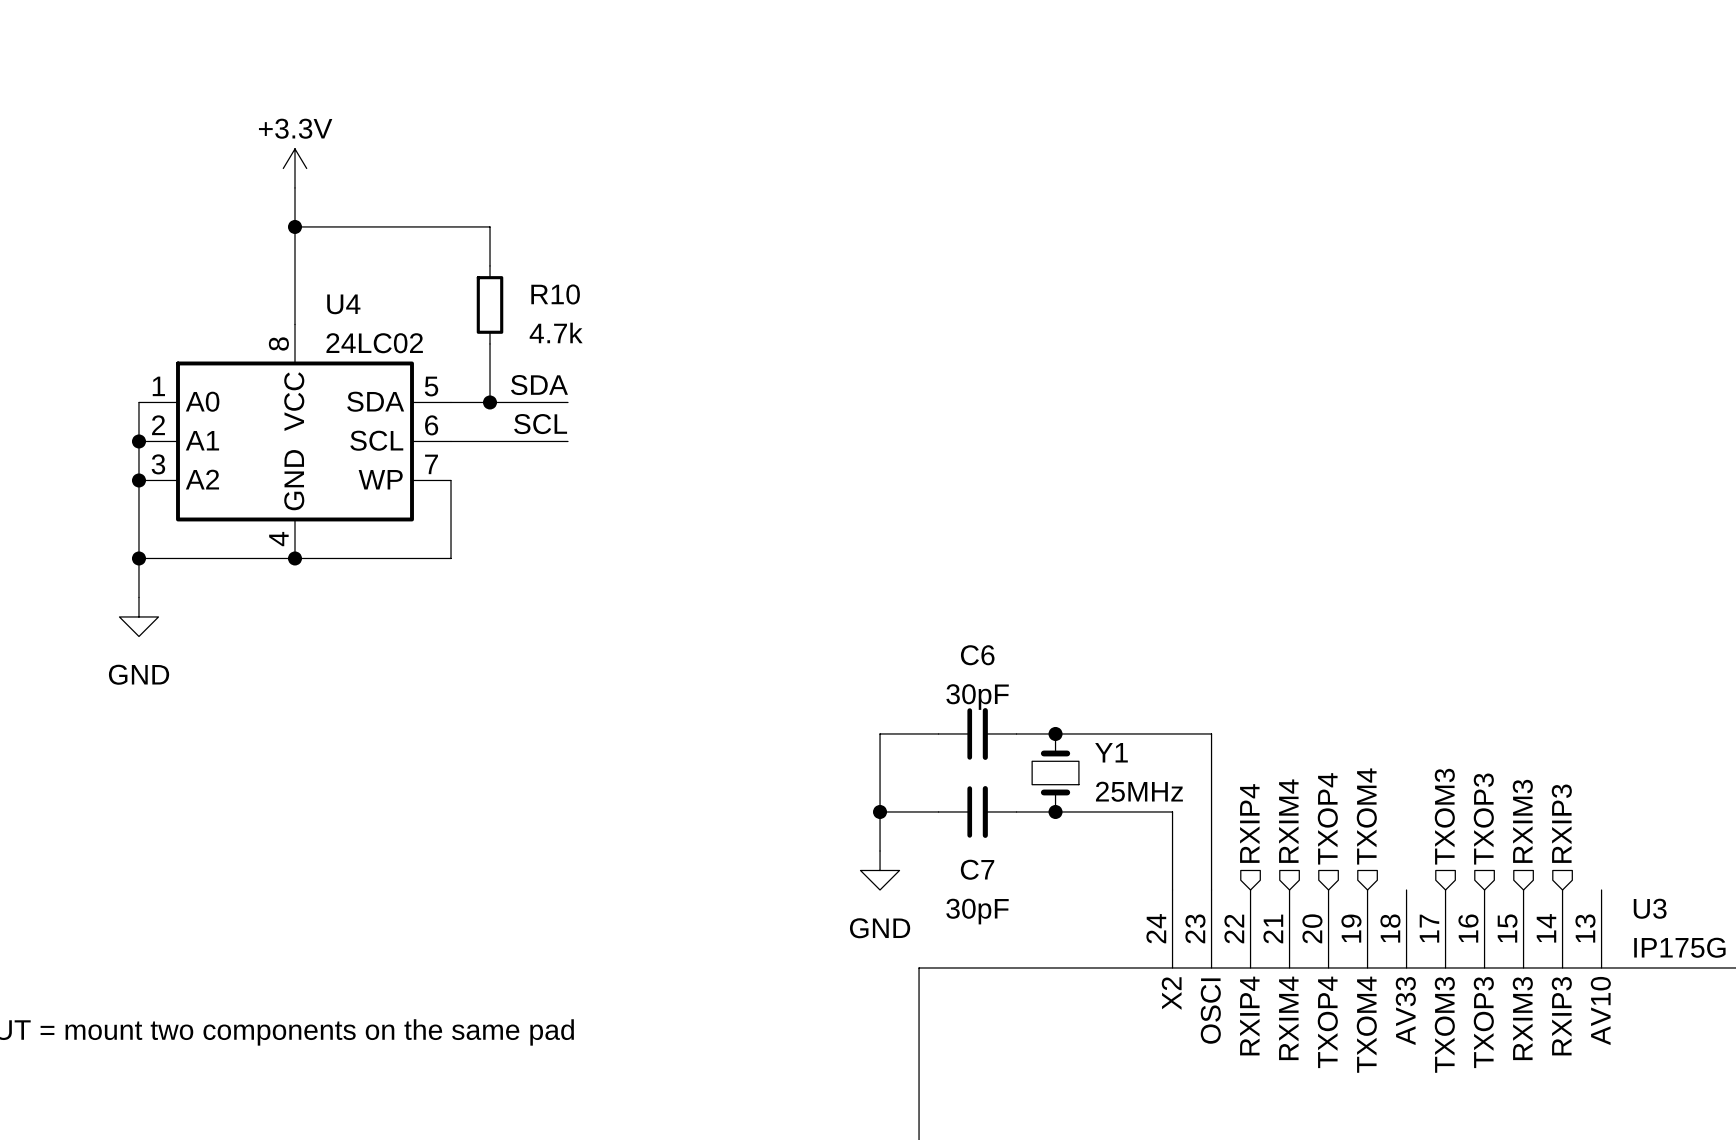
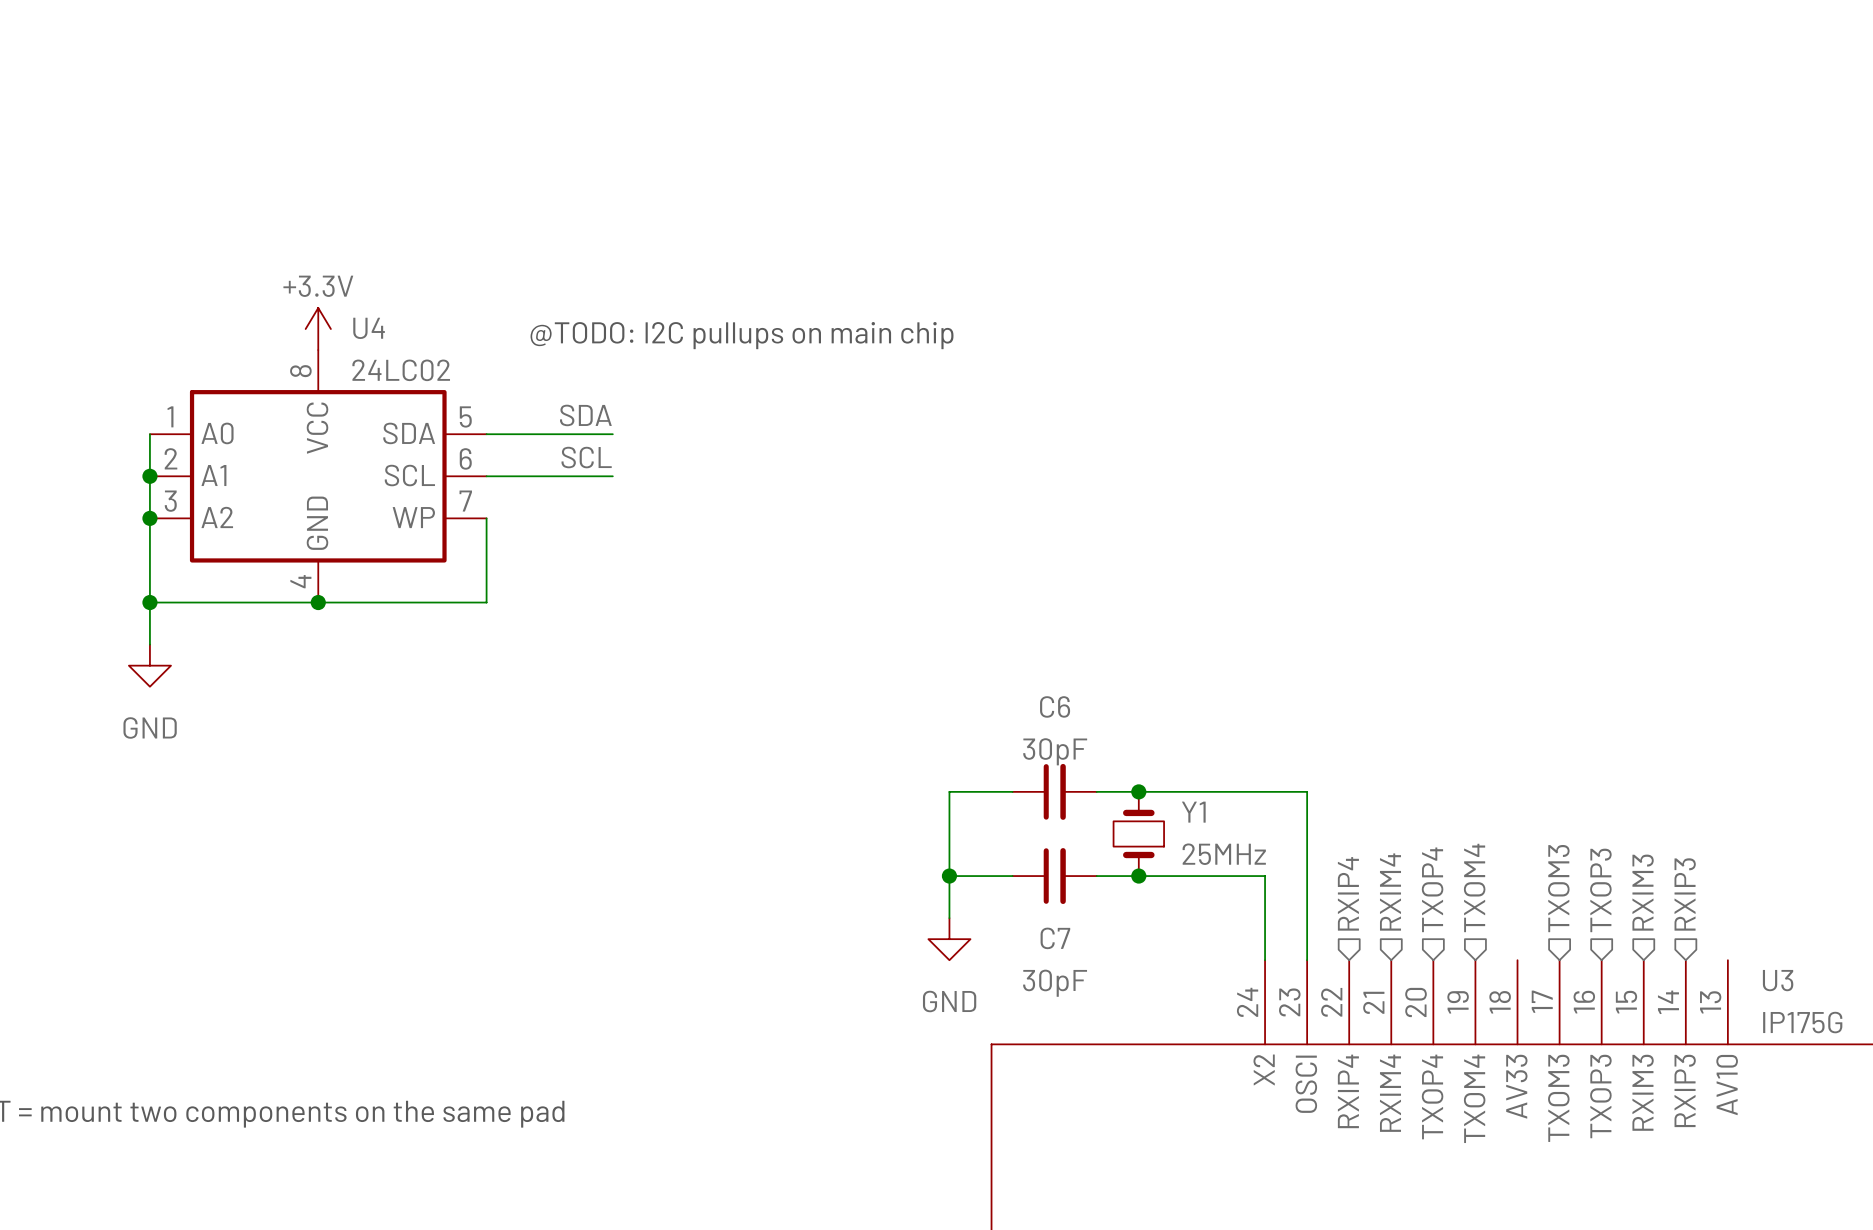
power symbol position: +3.3V (294, 168) -> +3.3V (318, 329)
wire: (294, 187) (294, 324) -> none
wire: (294, 226) (490, 226) (490, 265) -> none
junction: (294, 226) -> none
R10: 4.7k (490, 304) -> none
text: none -> @TODO: I2C pullups on main chip (742, 335)
wire: (490, 343) (490, 402) -> none
junction: (490, 402) -> none

